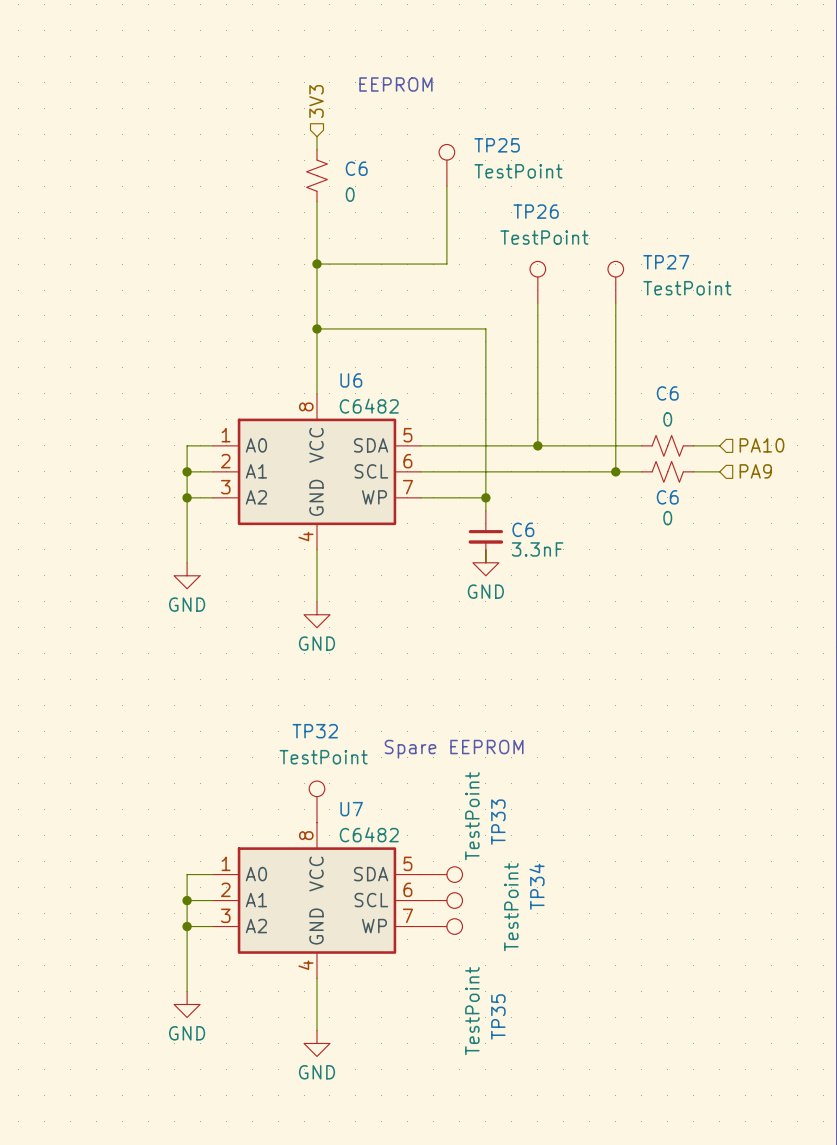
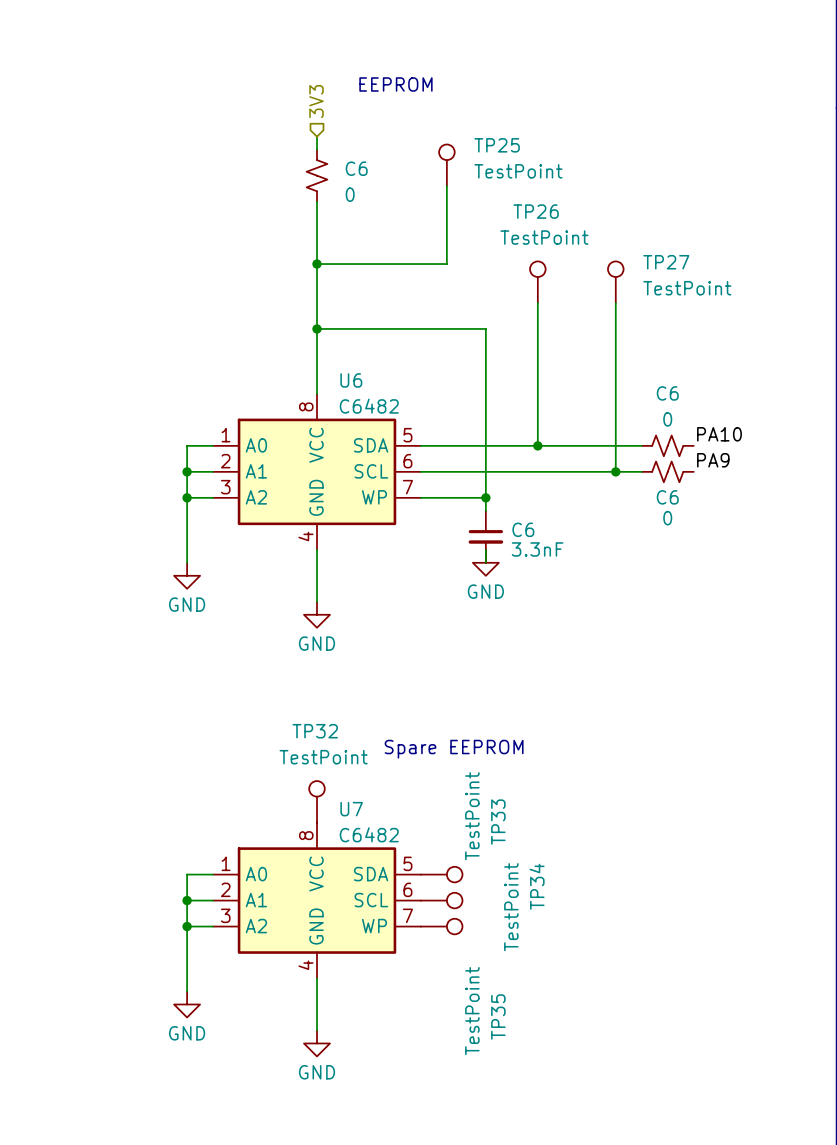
label: none -> PA10 (719, 434)
wire: (693, 445) (719, 445) -> none
hierarchical label: PA10 (761, 445) -> none
label: none -> PA9 (713, 460)
wire: (693, 471) (719, 471) -> none
hierarchical label: PA9 (755, 471) -> none

